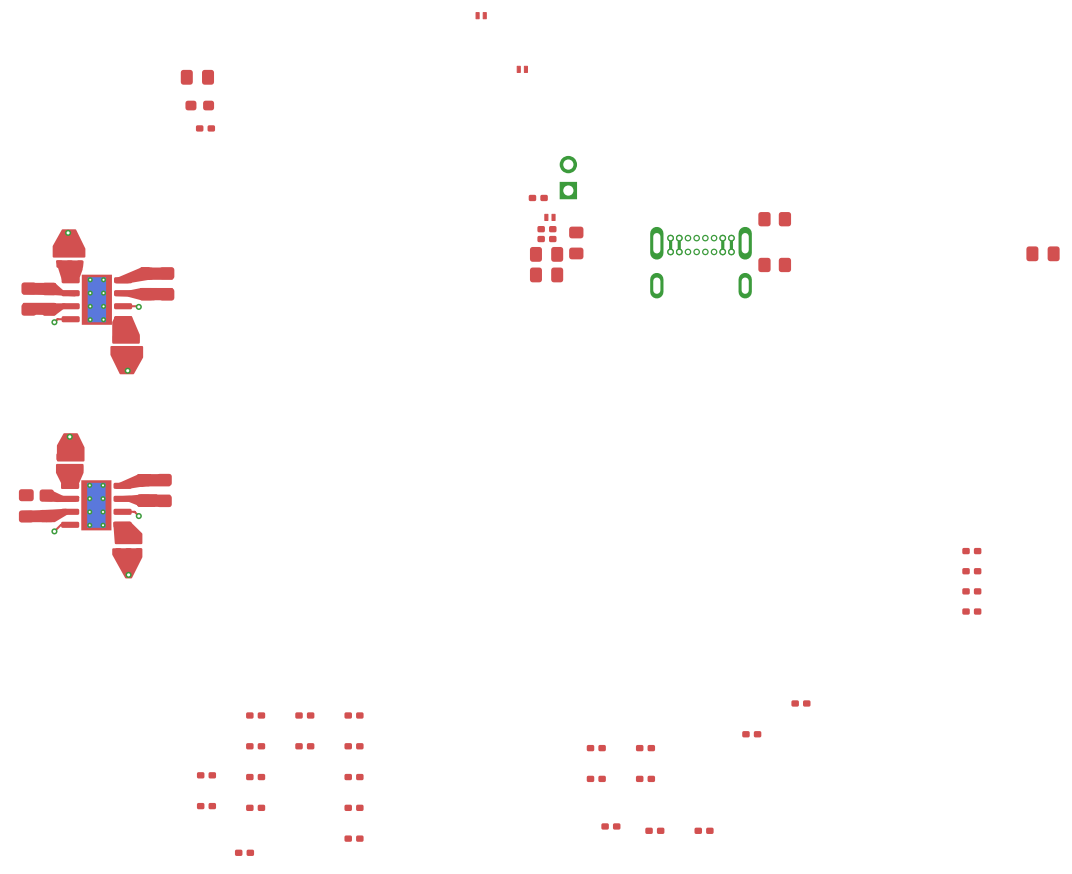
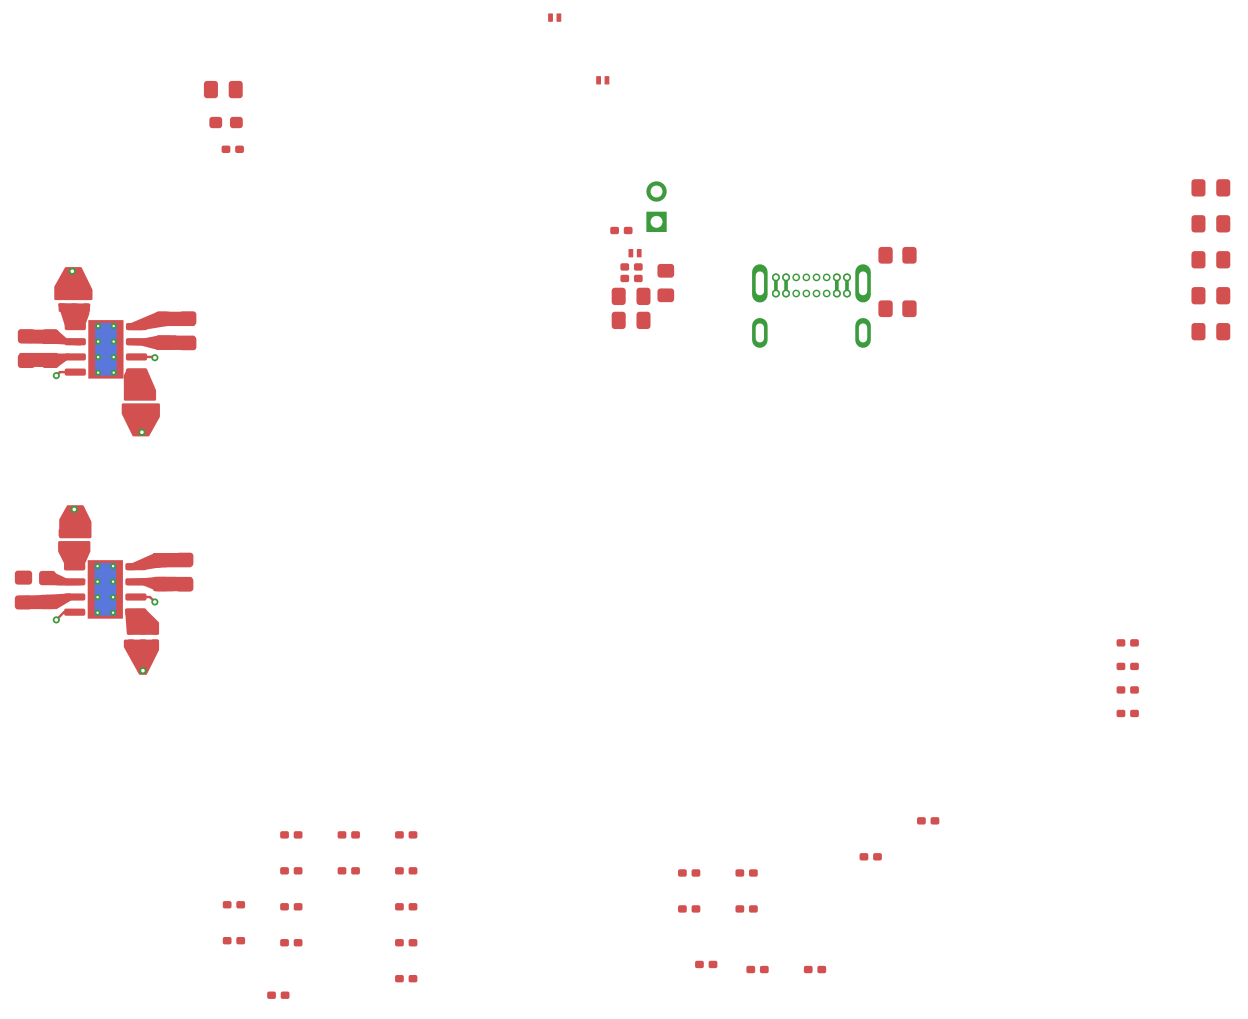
part: none -> (1210, 187)
part: none -> (1210, 223)
part: none -> (1210, 259)
part: none -> (1210, 331)

